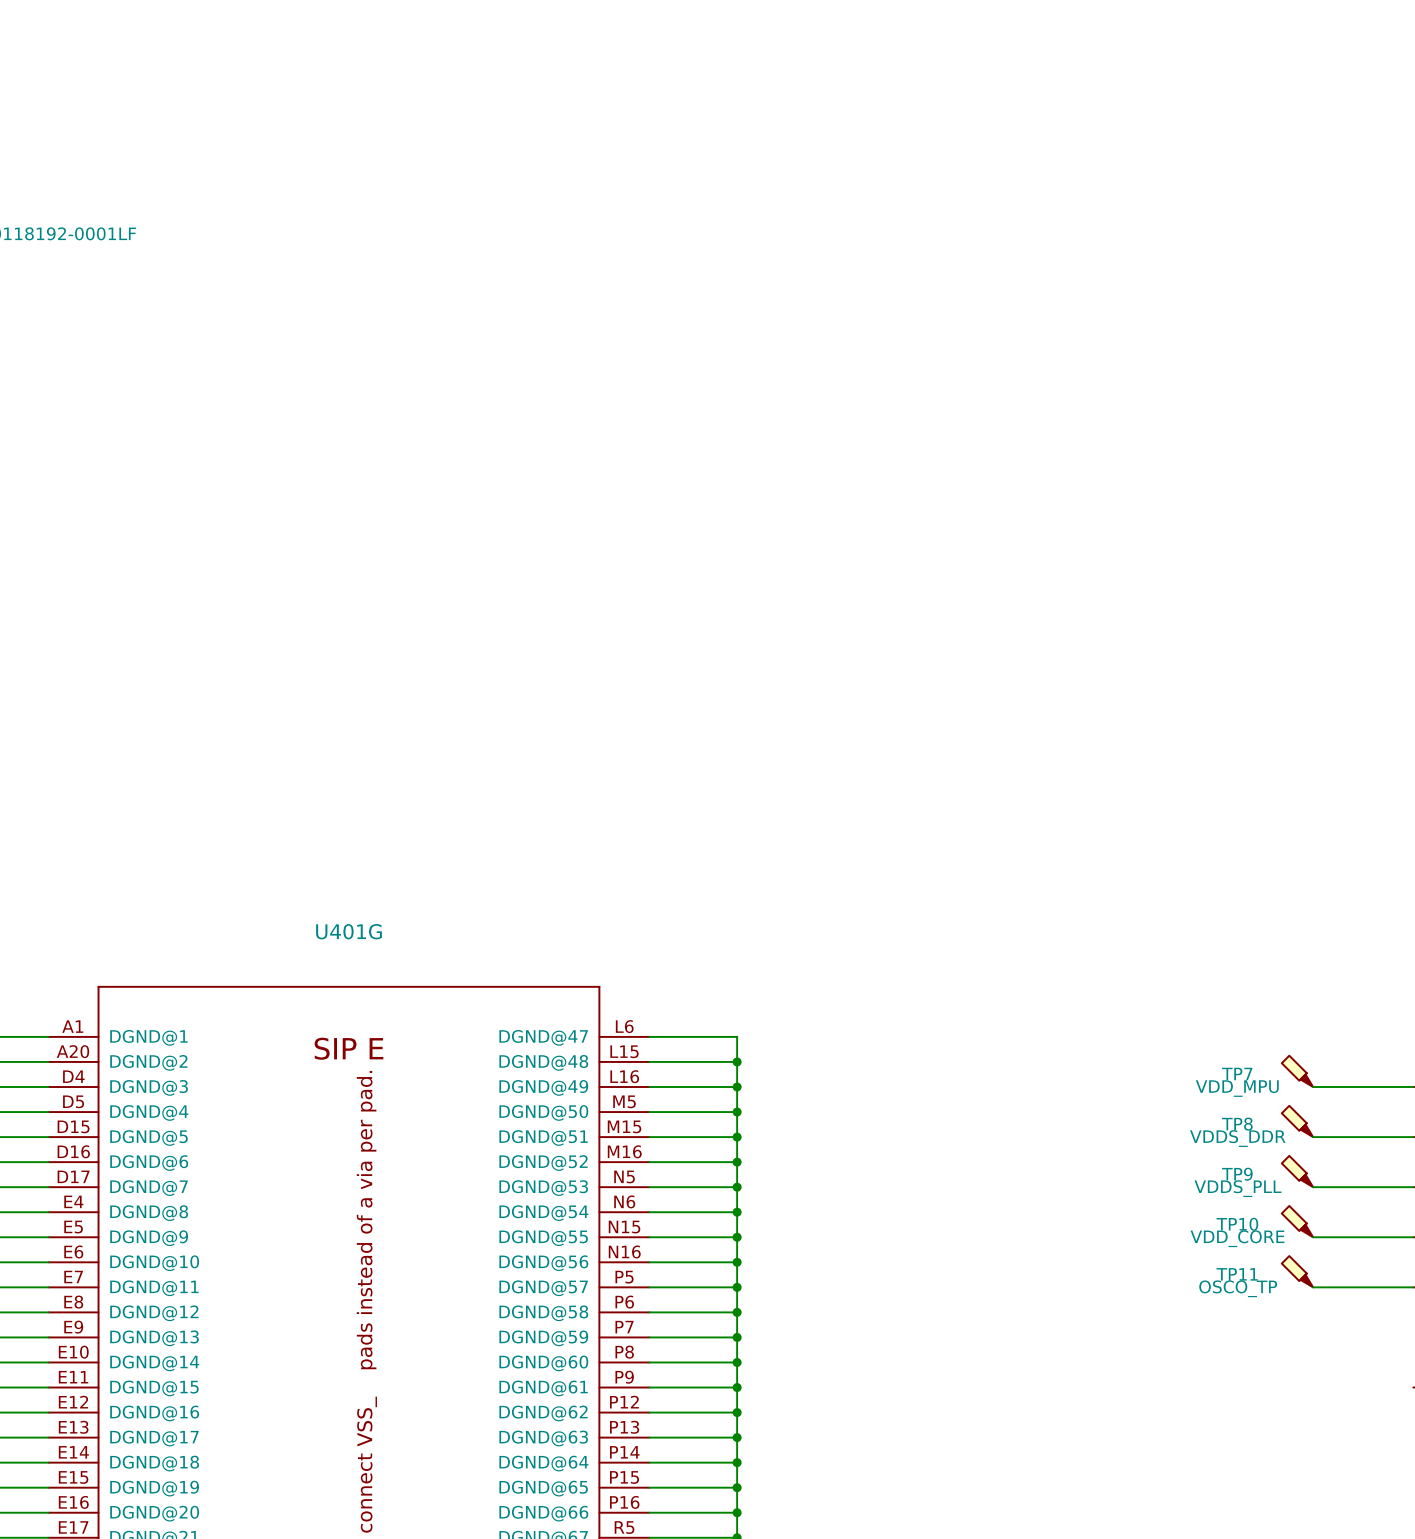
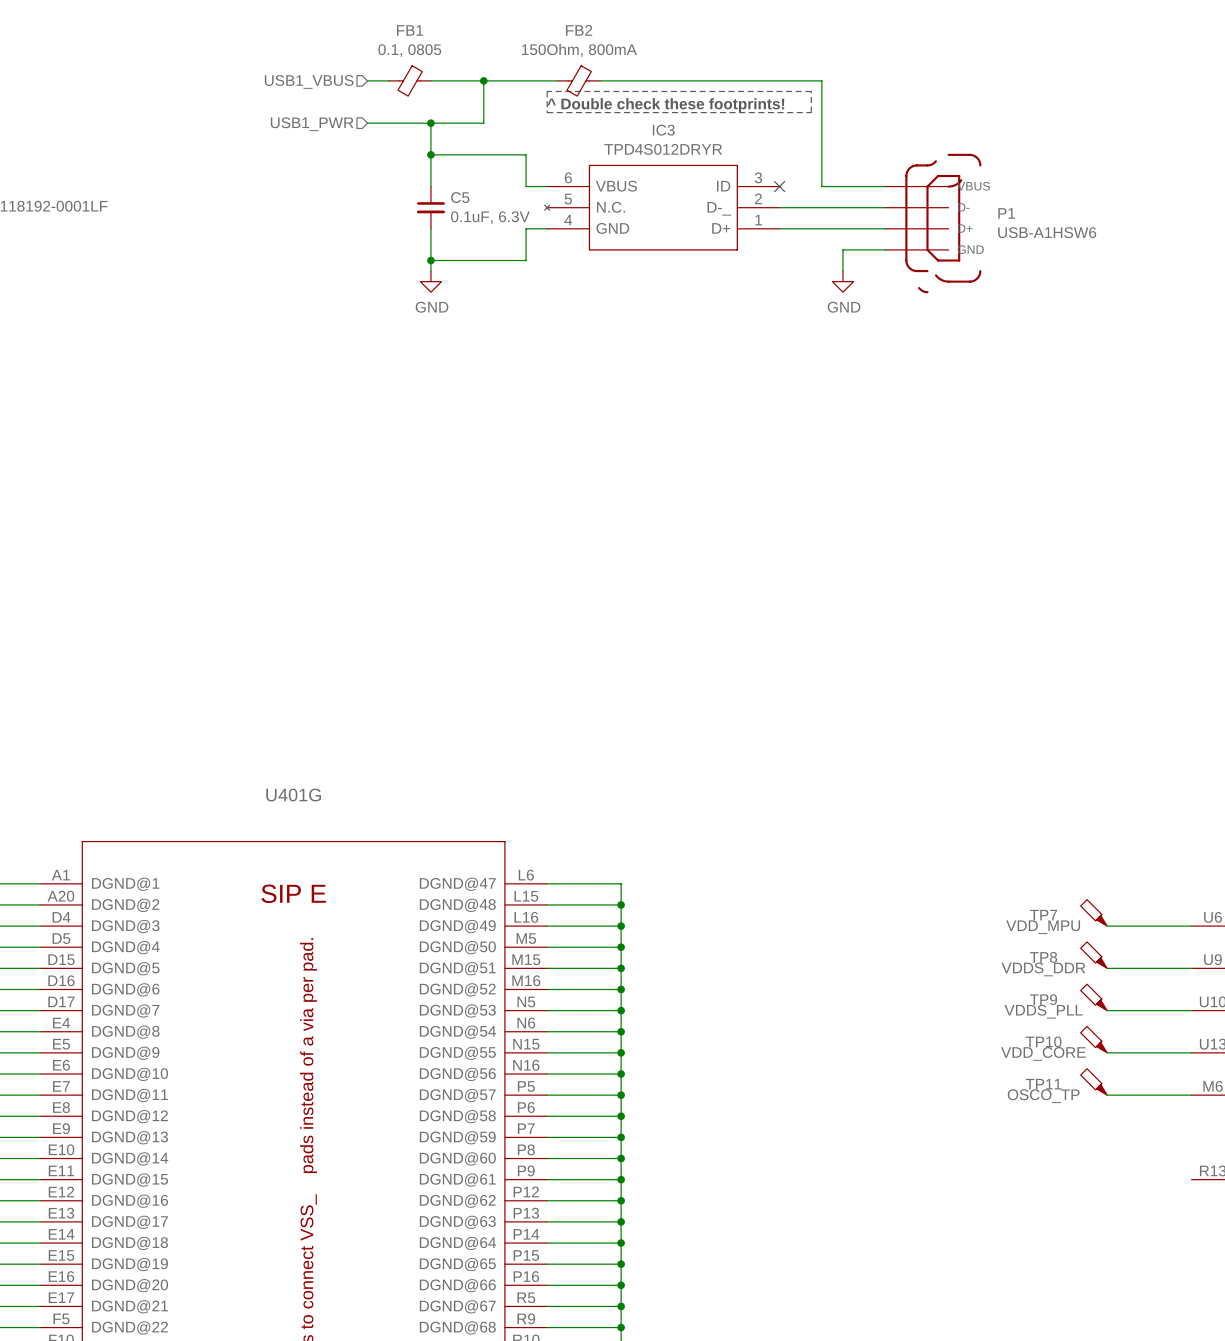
wire: none -> (367, 80) (388, 80)
FB1: none -> 0.1, 0805 (409, 80)
wire: none -> (430, 80) (557, 80)
wire: none -> (483, 80) (483, 123) (367, 123)
junction: none -> (483, 80)
FB2: none -> 150Ohm, 800mA (578, 80)
wire: none -> (599, 80) (821, 80) (821, 186) (885, 186)
hierarchical label: none -> USB1_VBUS (309, 81)
line: none -> (547, 91) (811, 91) (811, 112) (547, 112) (547, 91)
text: none -> ^ Double check these footprints! (665, 105)
wire: none -> (430, 123) (430, 186)
junction: none -> (430, 123)
hierarchical label: none -> USB1_PWR (312, 124)
wire: none -> (430, 154) (526, 154) (526, 186) (547, 186)
junction: none -> (430, 154)
no-connect mark: none -> (779, 186)
C5: none -> 0.1uF, 6.3V (430, 207)
IC3: none -> TPD4S012DRYR (662, 207)
wire: none -> (779, 207) (885, 207)
P1: none -> USB-A1HSW6 (933, 223)
wire: none -> (430, 228) (430, 271)
wire: none -> (547, 228) (526, 228) (526, 260) (430, 260)
wire: none -> (779, 228) (885, 228)
wire: none -> (885, 249) (842, 249) (842, 271)
junction: none -> (430, 260)
power symbol: none -> GND (430, 281)
power symbol: none -> GND (842, 281)

